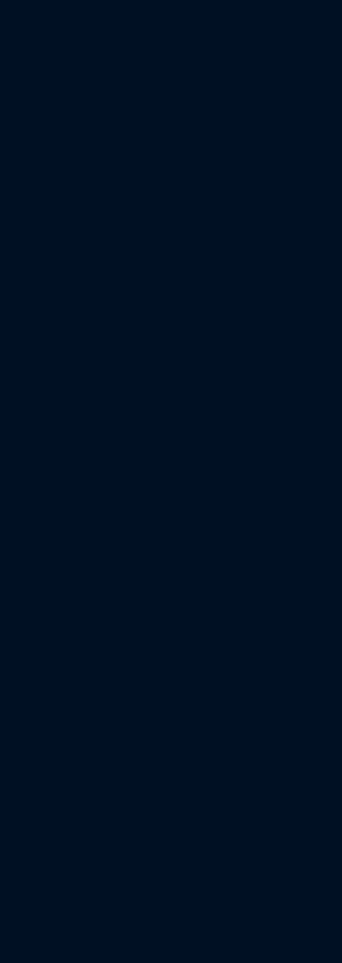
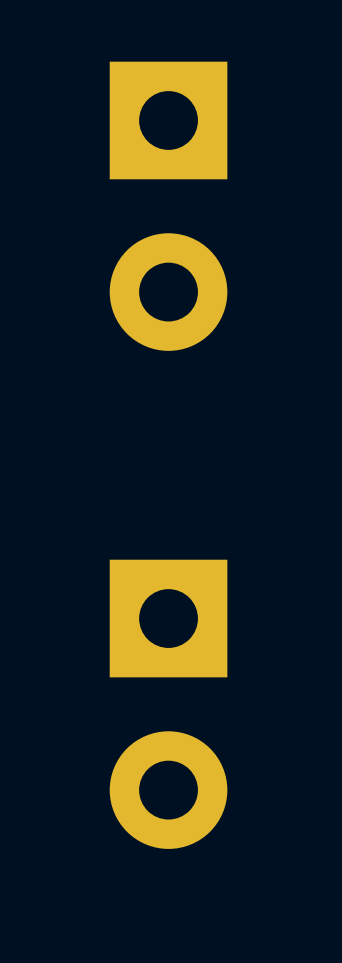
part: none -> (168, 206)
part: none -> (168, 704)

